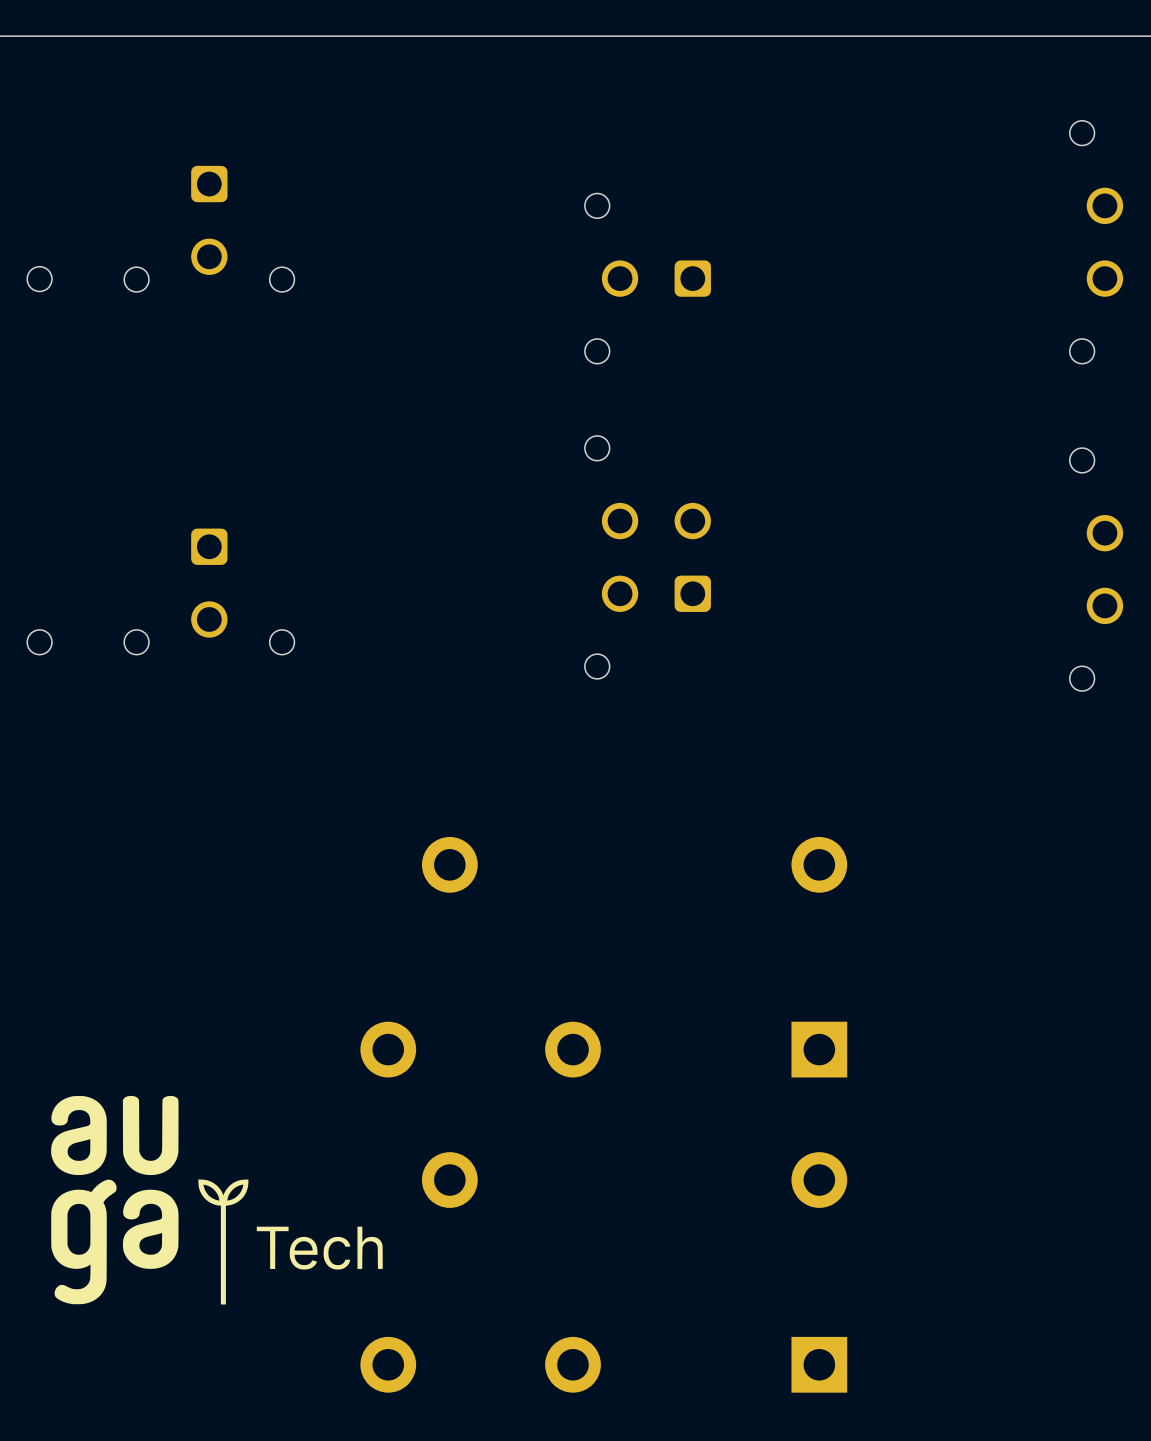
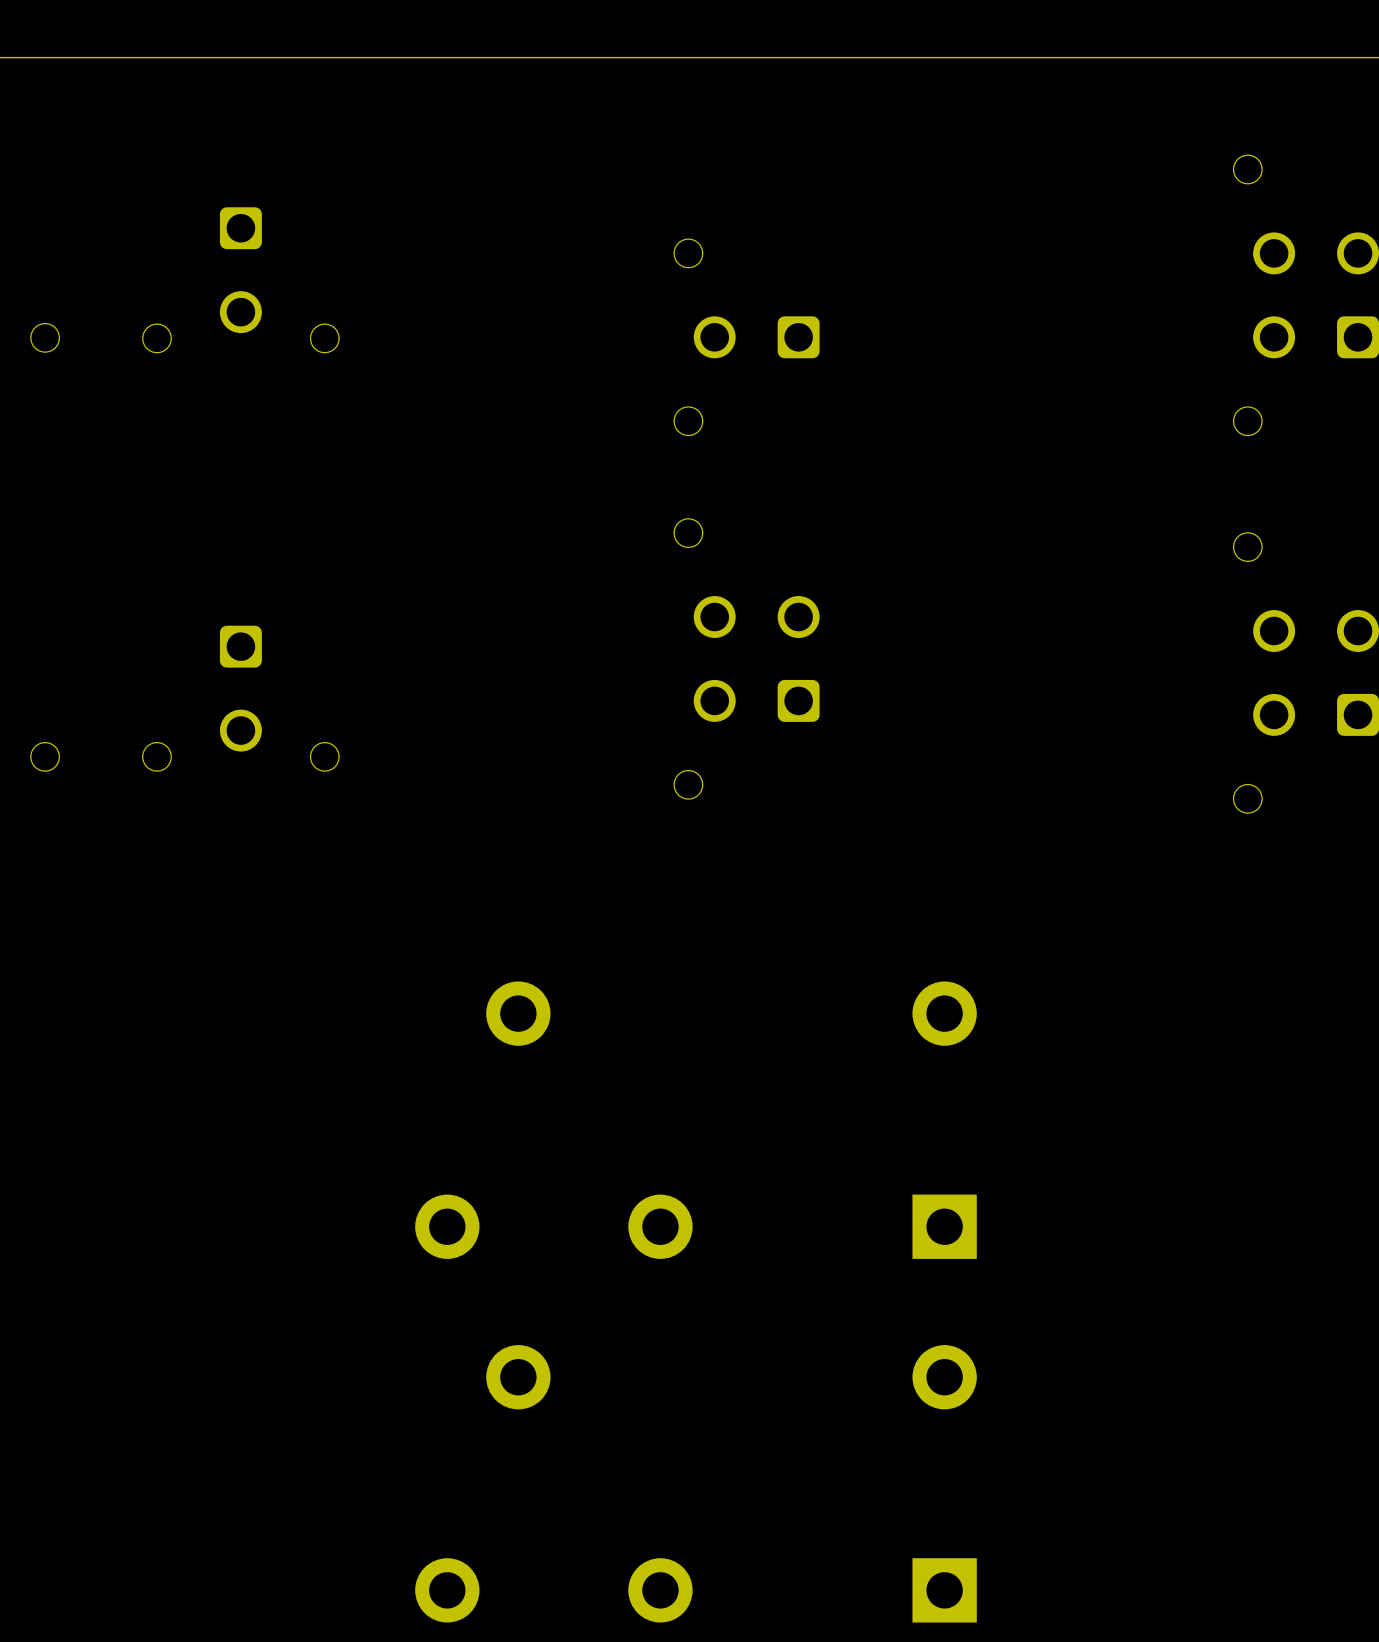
drawing: [51, 1095, 383, 1305] -> none

